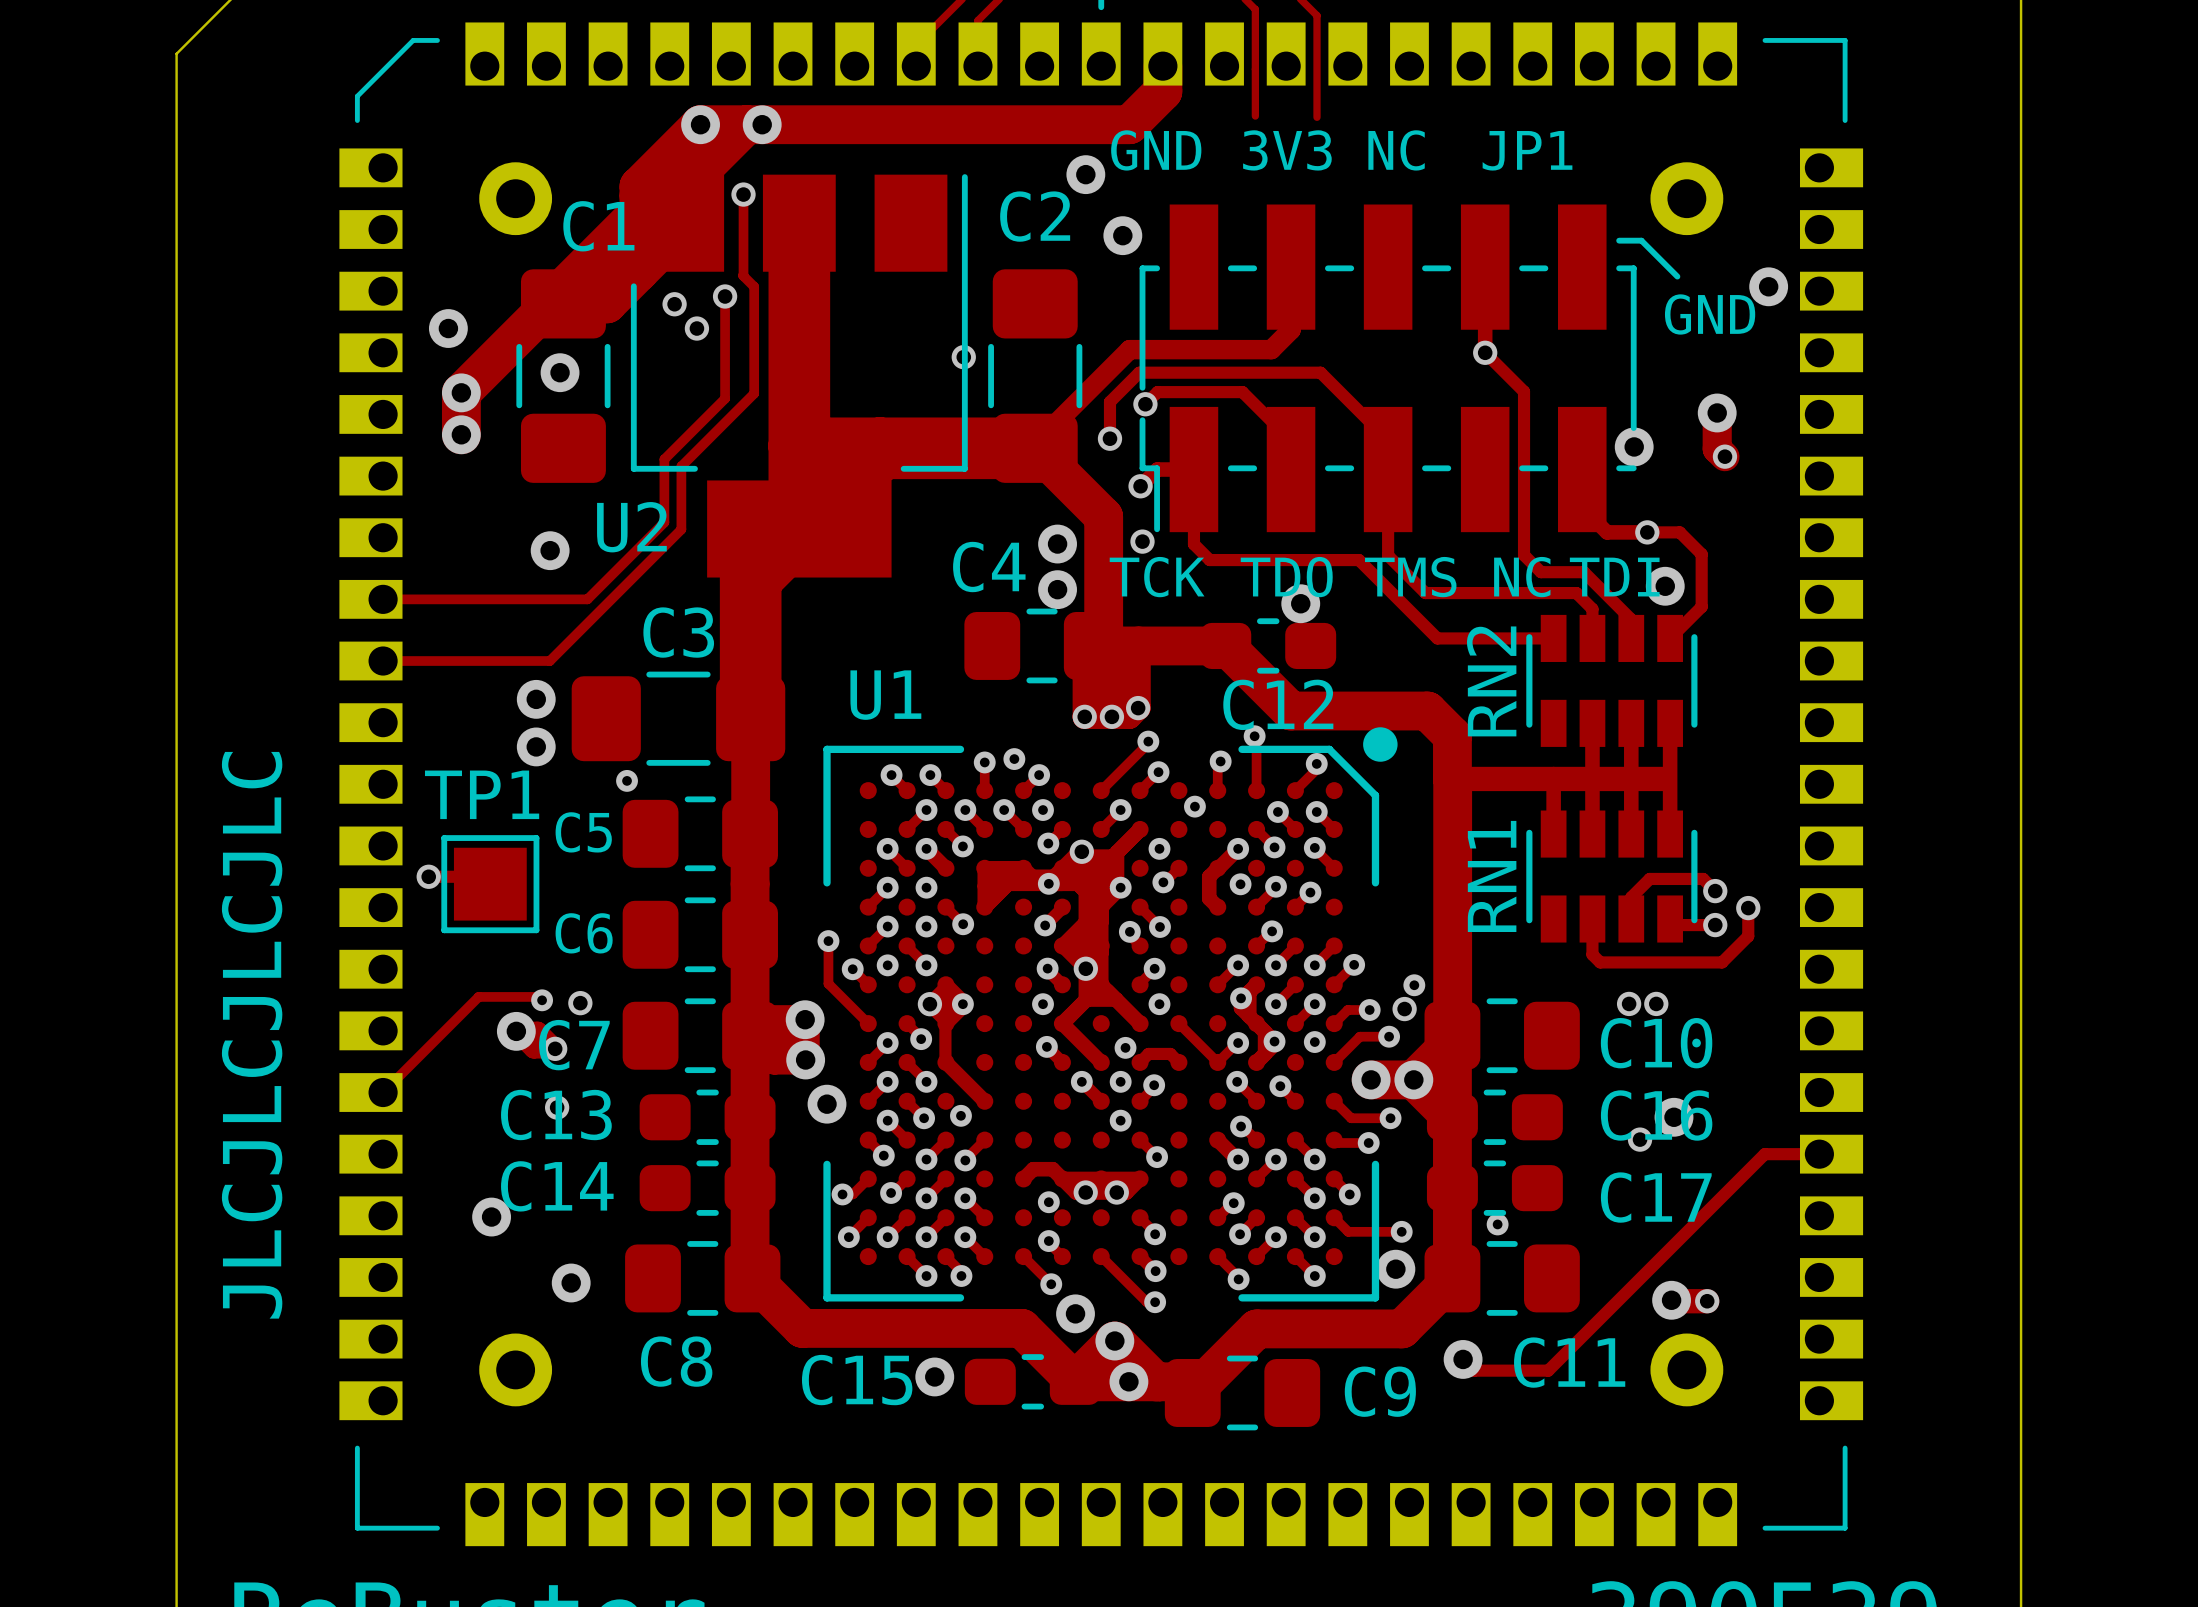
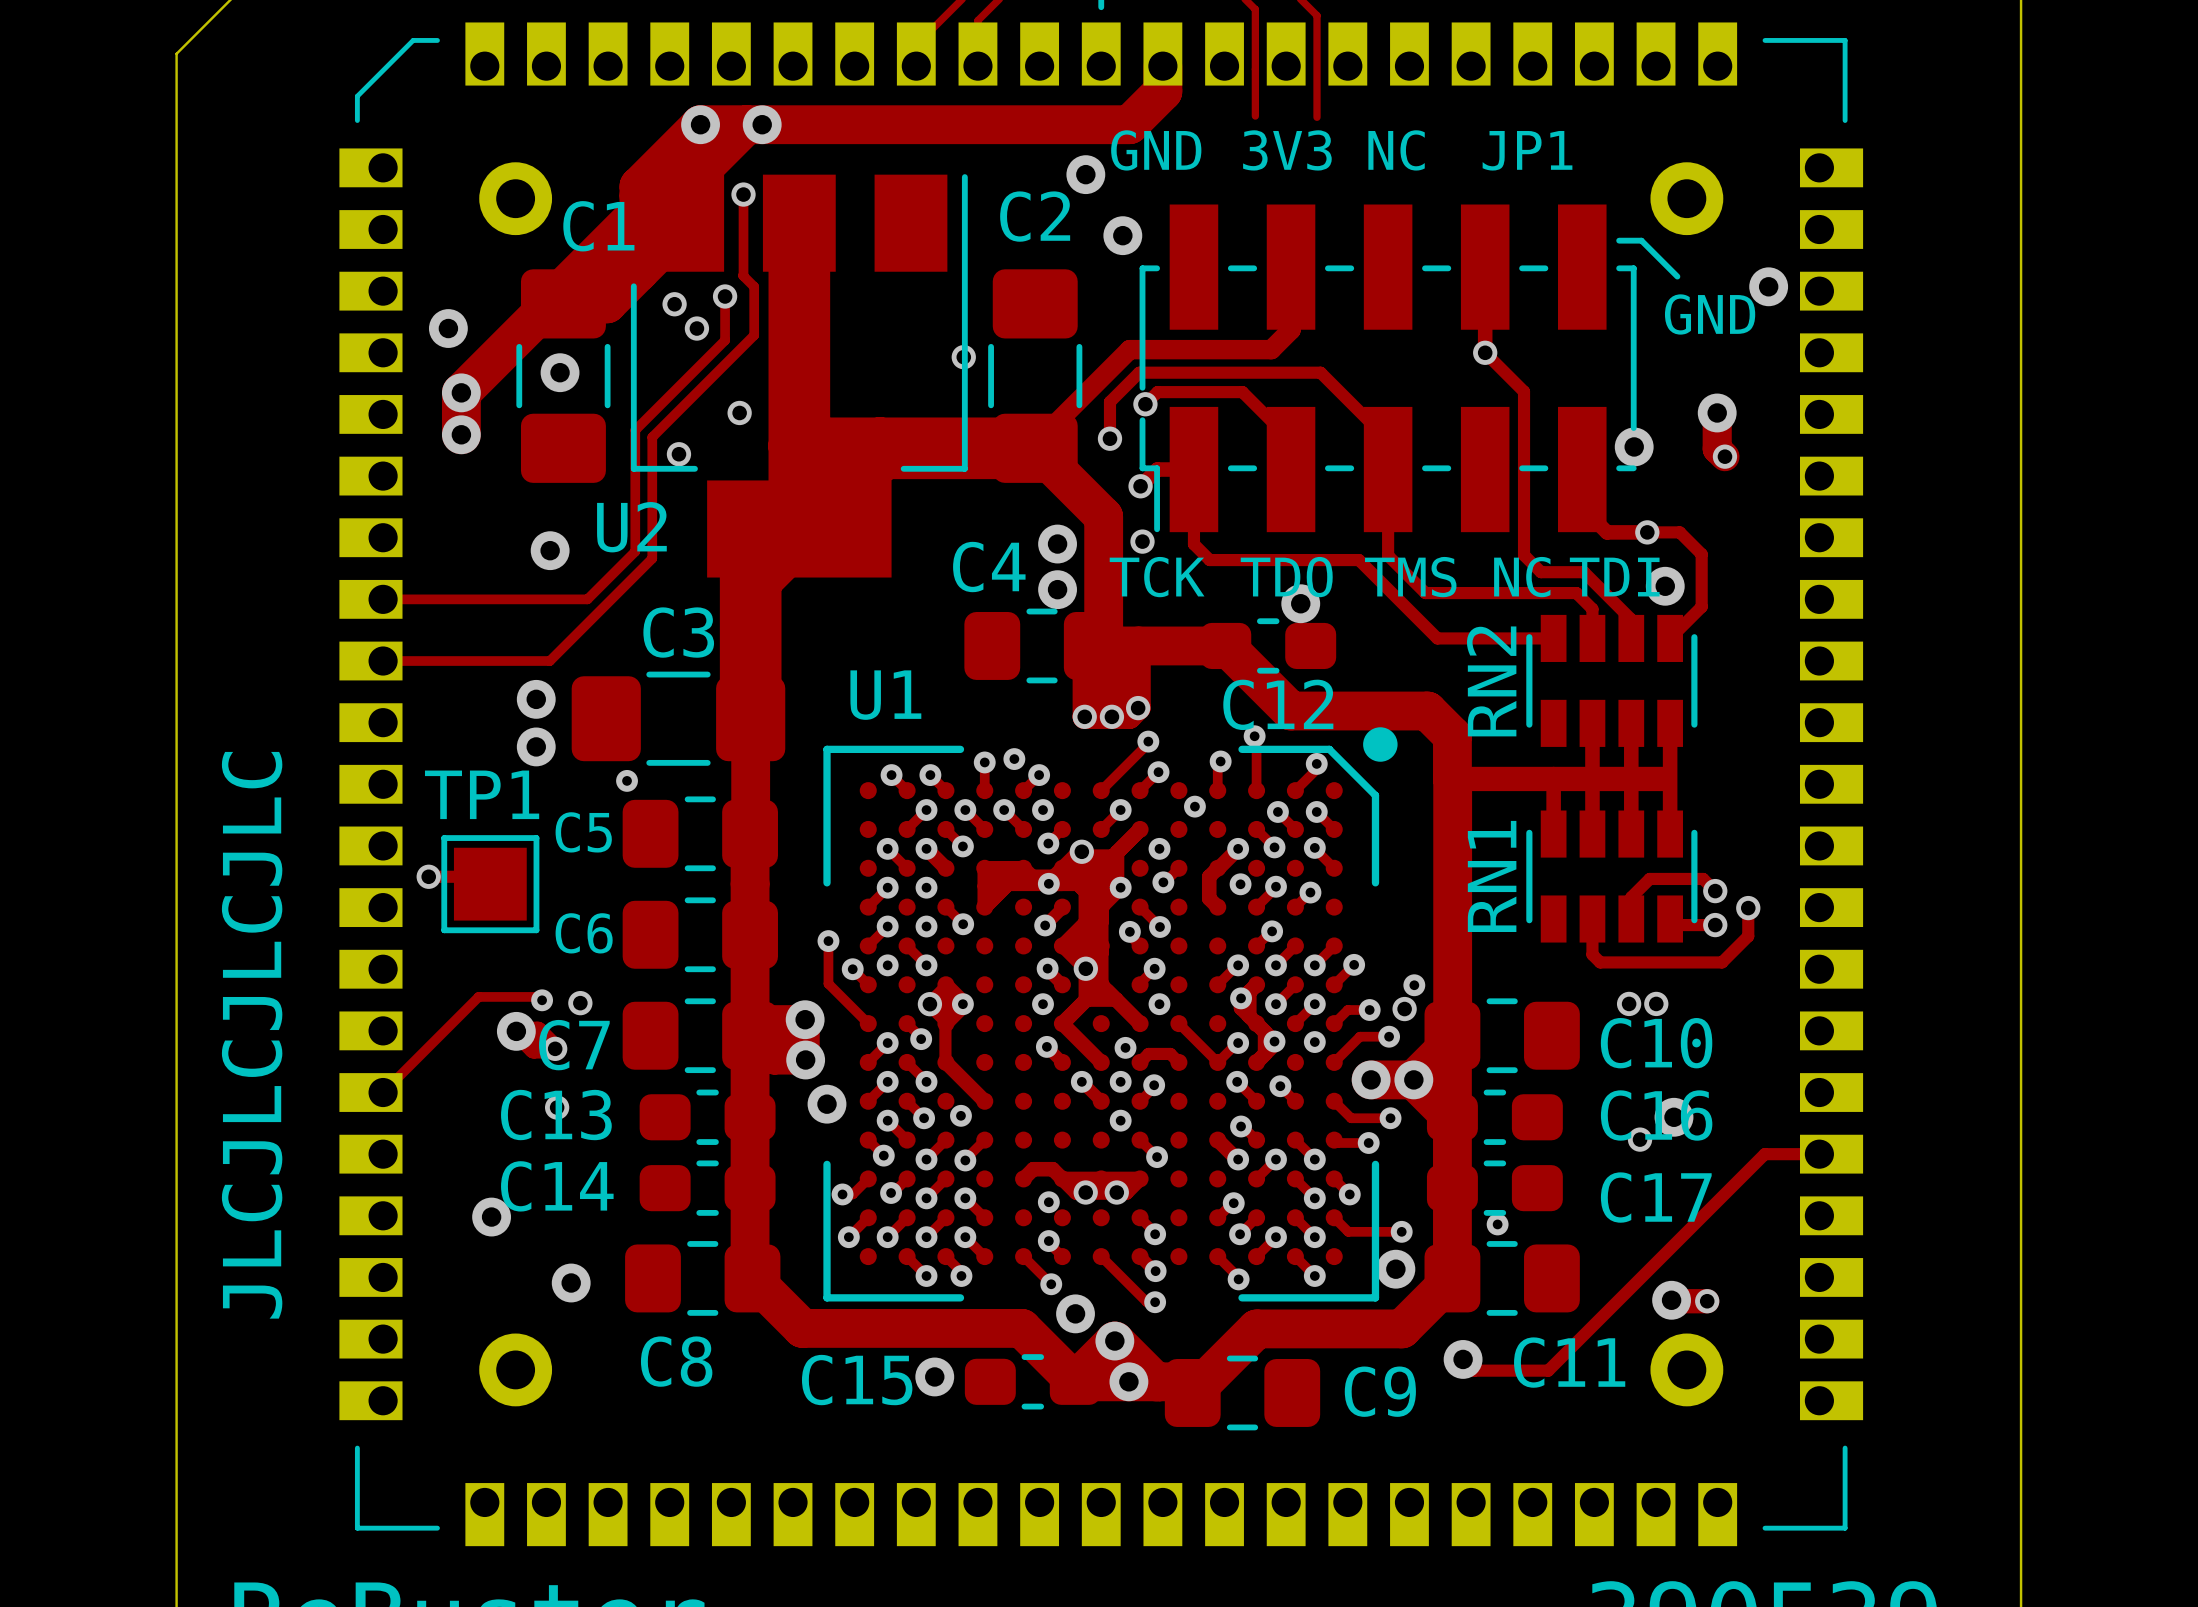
track: (754, 335) (754, 393) (681, 466) (681, 529) (652, 558) -> (754, 335) (652, 437) (652, 558)
track: (725, 340) (725, 398) (664, 459) (664, 522) (635, 551) -> (725, 340) (635, 430) (635, 551)
via: none -> (739, 412)
via: none -> (678, 454)

